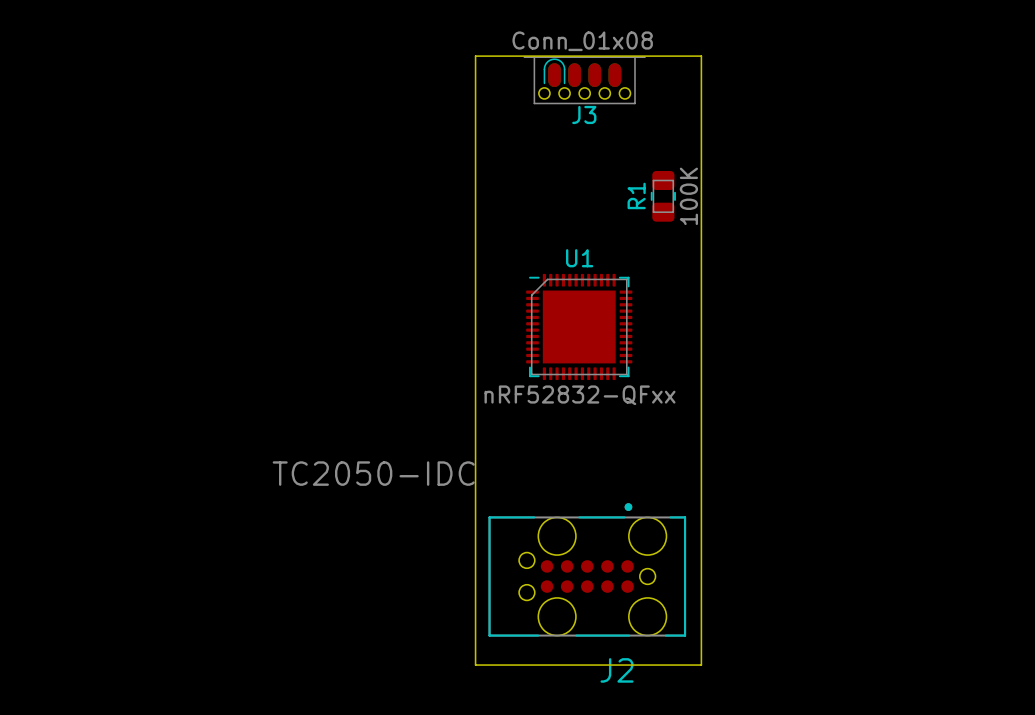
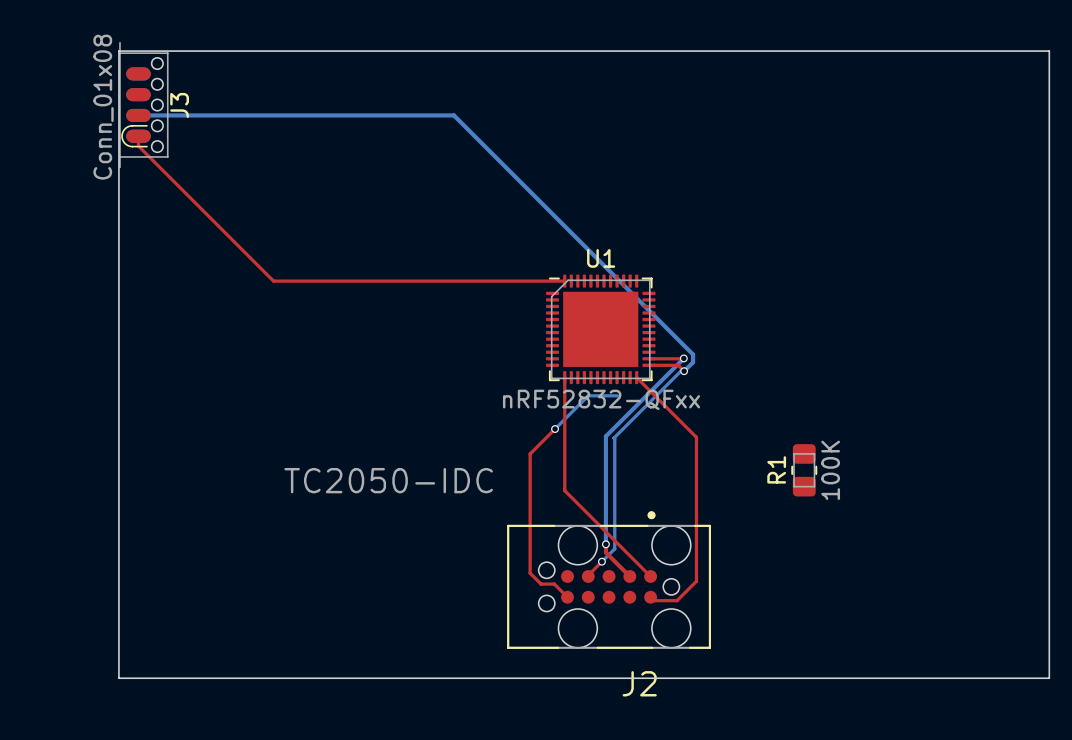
J3 rotation: 0° (584, 80) -> 90° counterclockwise (143, 105)
J3 position: (584, 80) -> (143, 105)
bottom track: none -> (138, 115) (453, 115) (693, 354) (693, 362) (684, 371) (680, 371) (613, 438) (614, 548) (601, 561)
top track: none -> (138, 136) (138, 146) (273, 281) (564, 281)
R1 position: (663, 196) -> (804, 470)
top track: none -> (683, 358) (648, 358)
bottom track: none -> (683, 358) (605, 436) (605, 544)
via: none -> (683, 358)
top track: none -> (648, 365) (678, 365) (684, 371)
via: none -> (684, 371)
top track: none -> (564, 377) (564, 490) (650, 576)
top track: none -> (636, 377) (696, 437) (696, 581) (677, 600) (654, 600)
bottom track: none -> (617, 395) (588, 395) (555, 429)
top track: none -> (555, 429) (530, 453) (530, 573) (541, 584) (554, 584) (567, 597)
via: none -> (555, 429)
top track: none -> (605, 544) (605, 552) (629, 576)
via: none -> (605, 544)
top track: none -> (601, 561) (588, 575)
via: none -> (601, 561)
board edge: (475, 665) (475, 56) (701, 56) (701, 665) -> (493, 678) (118, 678) (118, 51) (1049, 51) (1049, 678) (726, 678)

